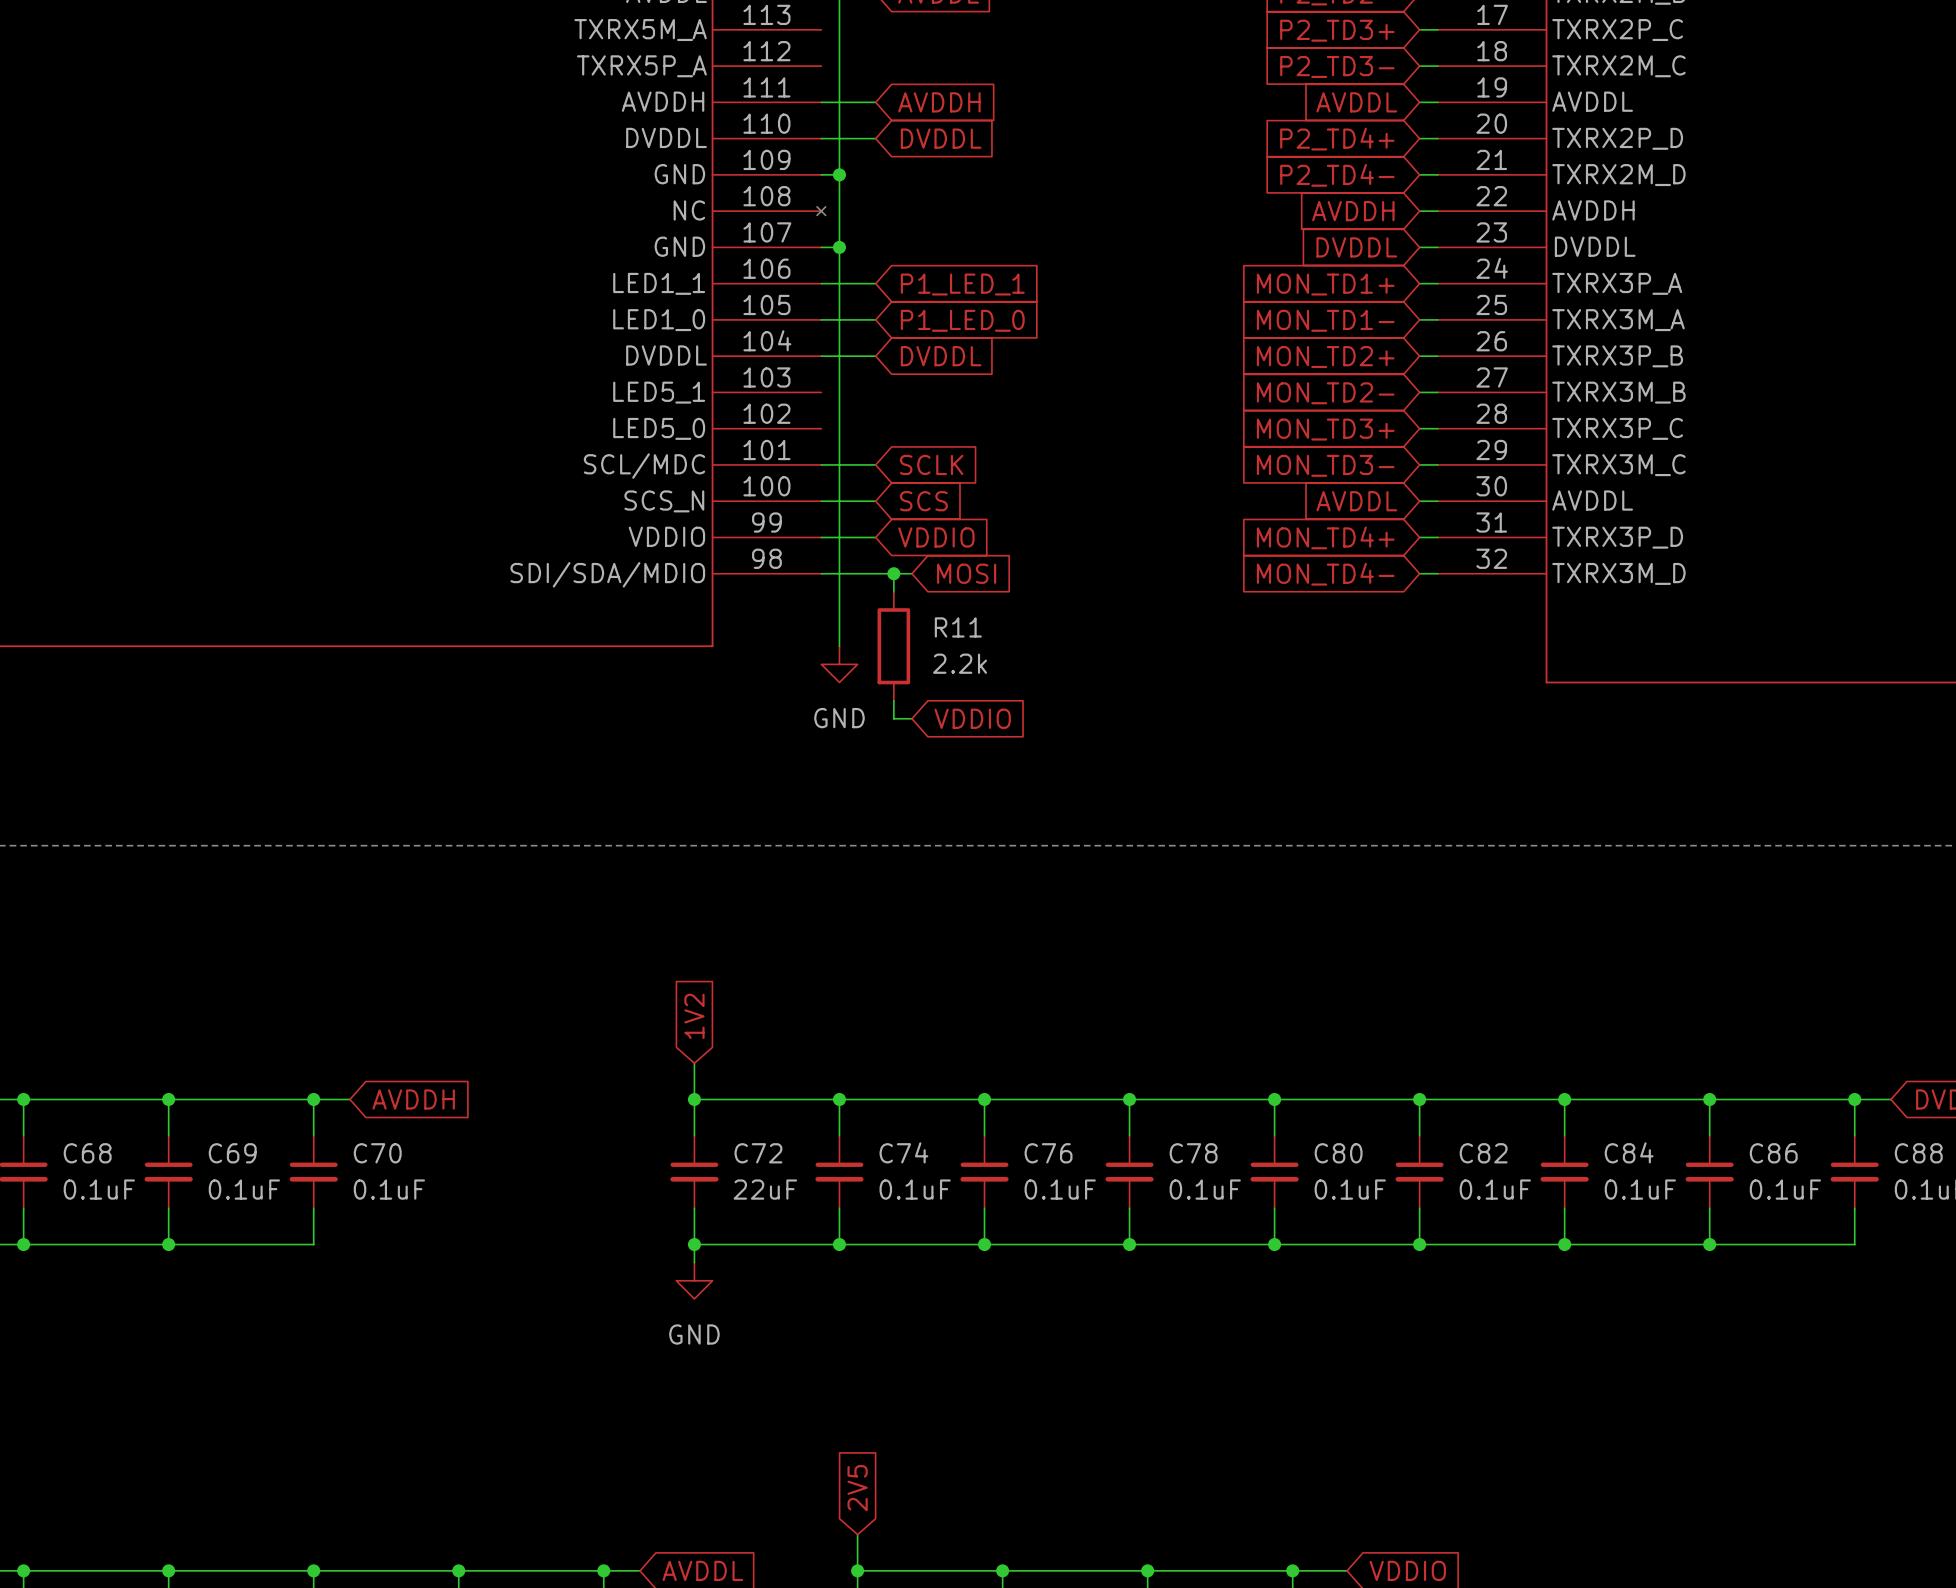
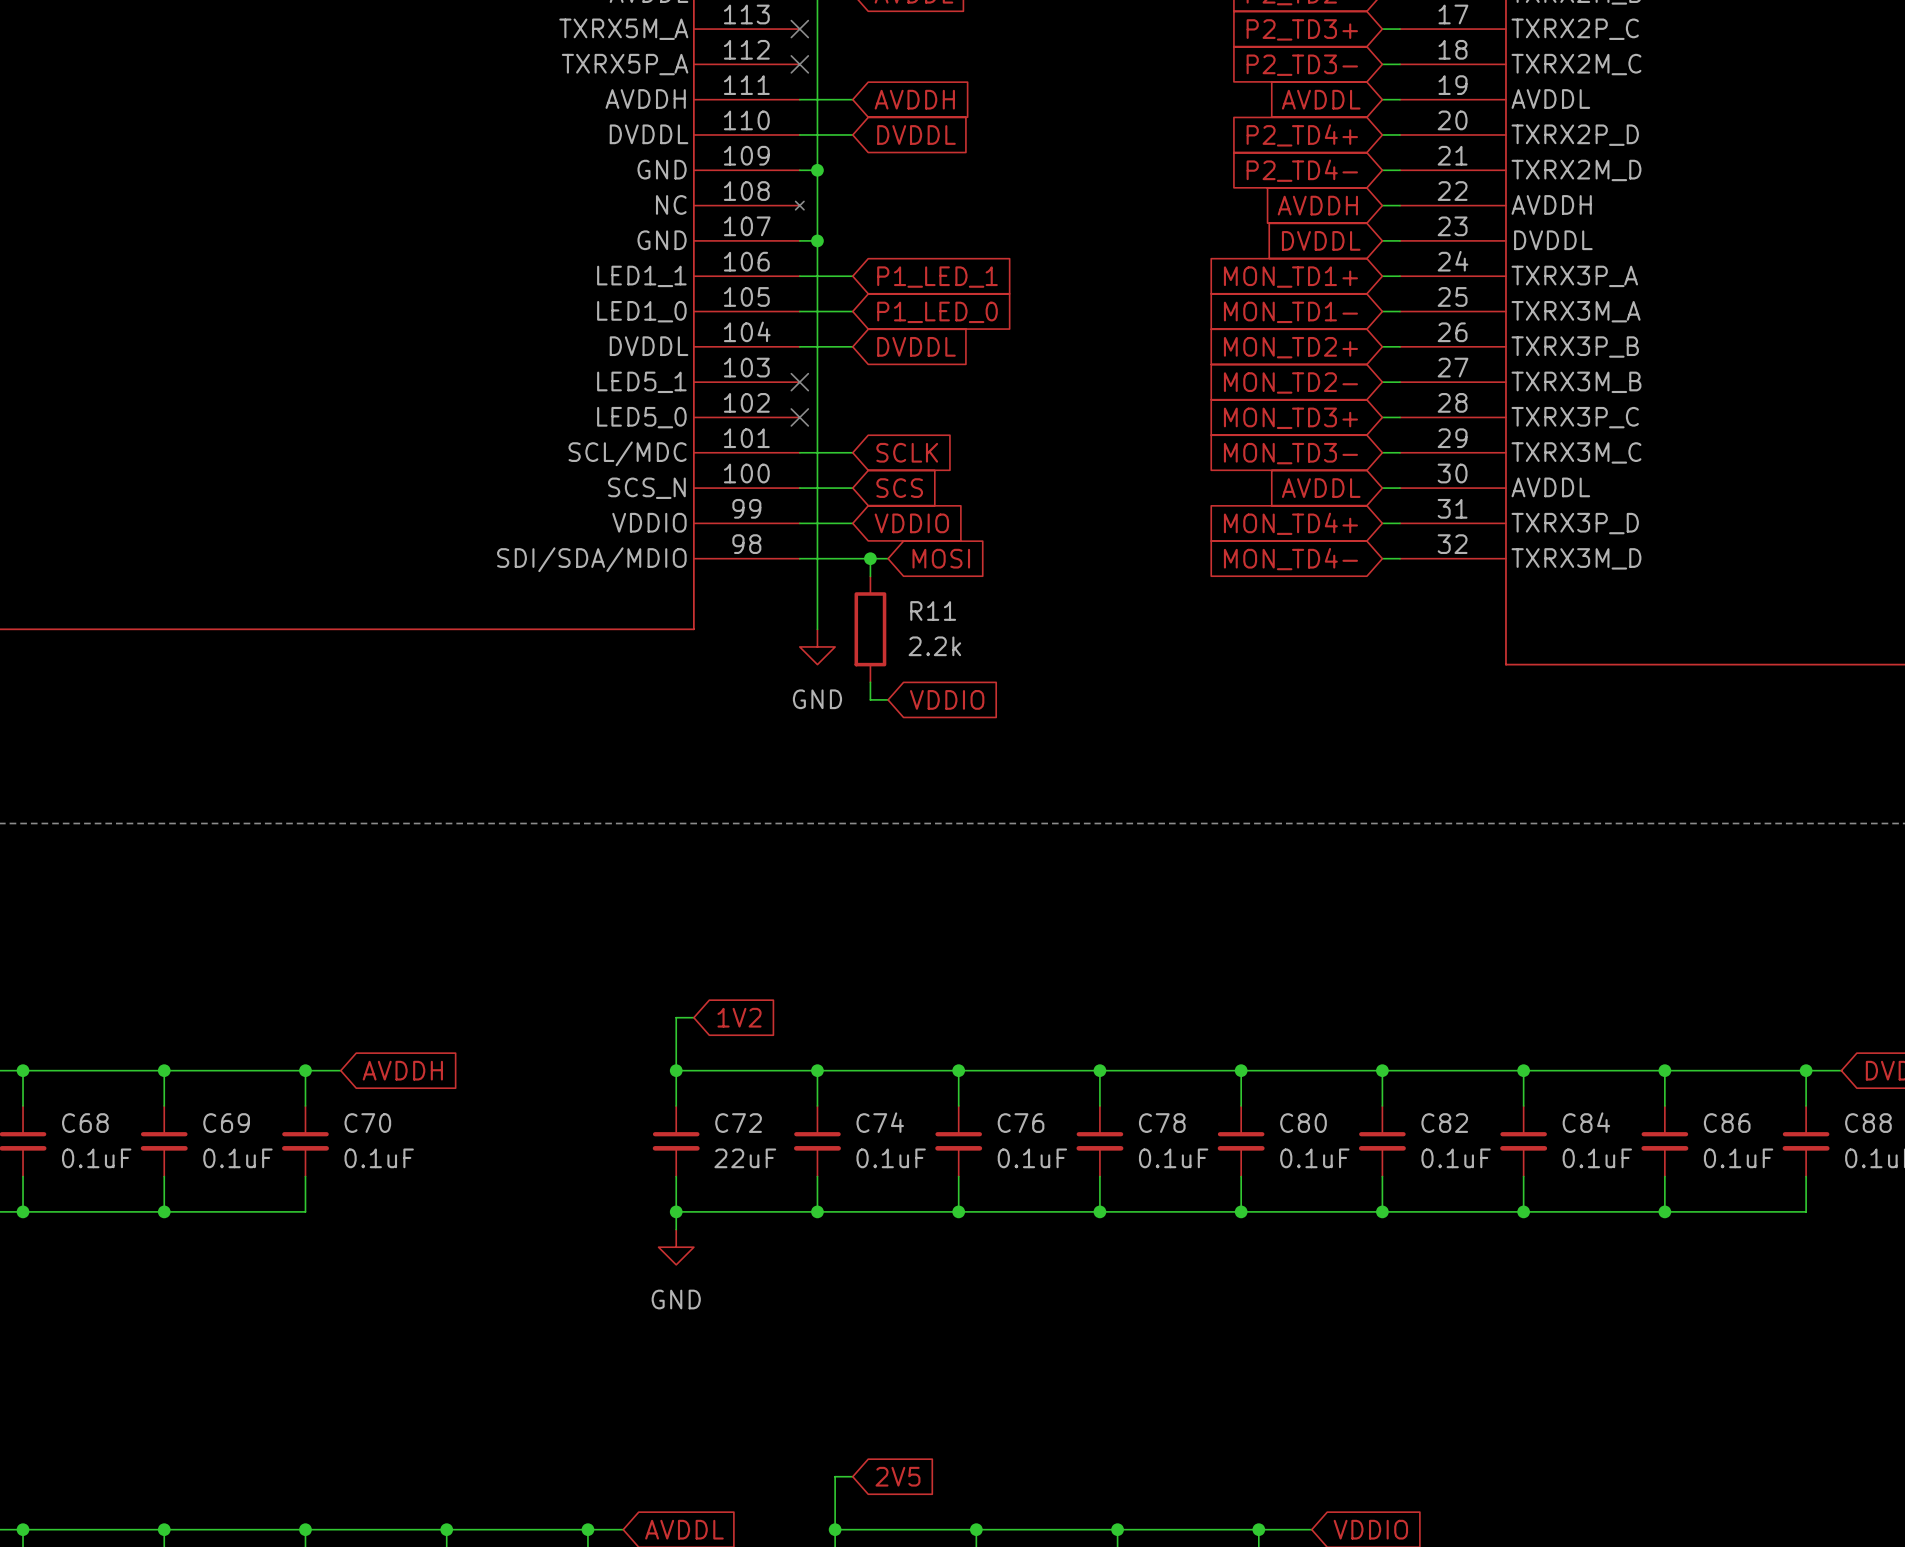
no-connect mark: none -> (799, 29)
no-connect mark: none -> (799, 64)
no-connect mark: none -> (799, 382)
no-connect mark: none -> (799, 417)
global label rotation: 0° (694, 1016) -> 90° clockwise (739, 1017)
wire: none -> (693, 1017) (676, 1017) (676, 1035)
global label rotation: 0° (857, 1488) -> 90° clockwise (897, 1476)
wire: none -> (852, 1476) (835, 1476) (835, 1494)

